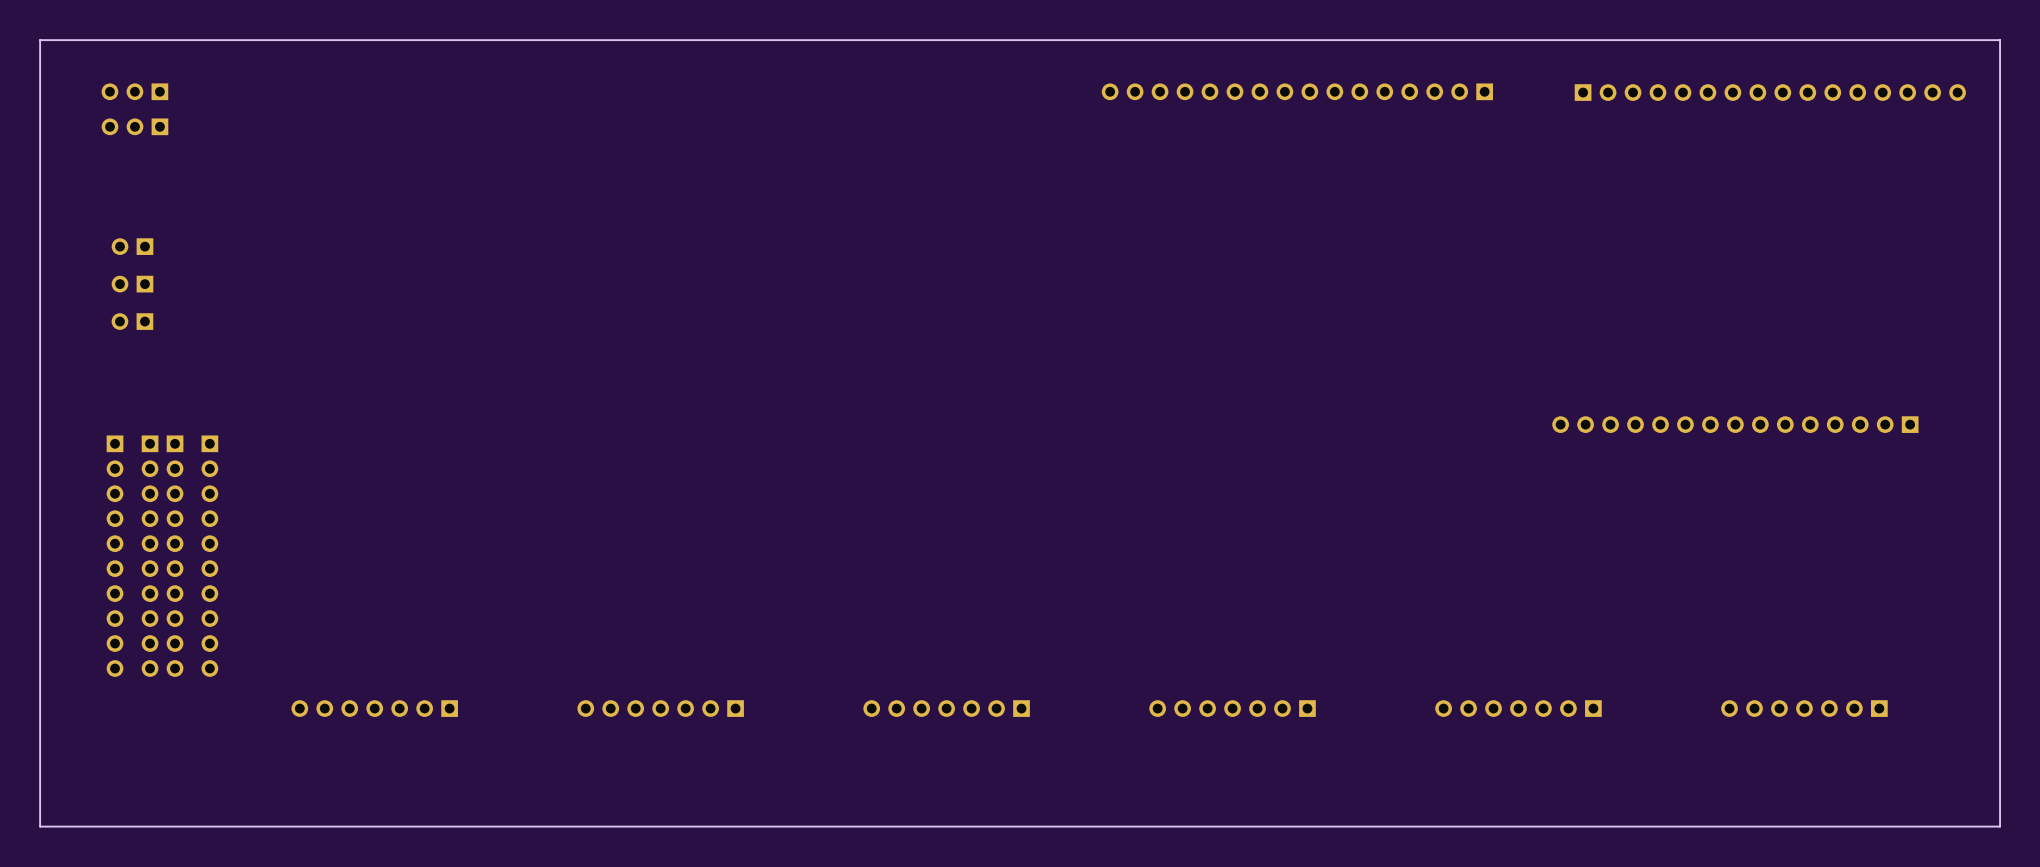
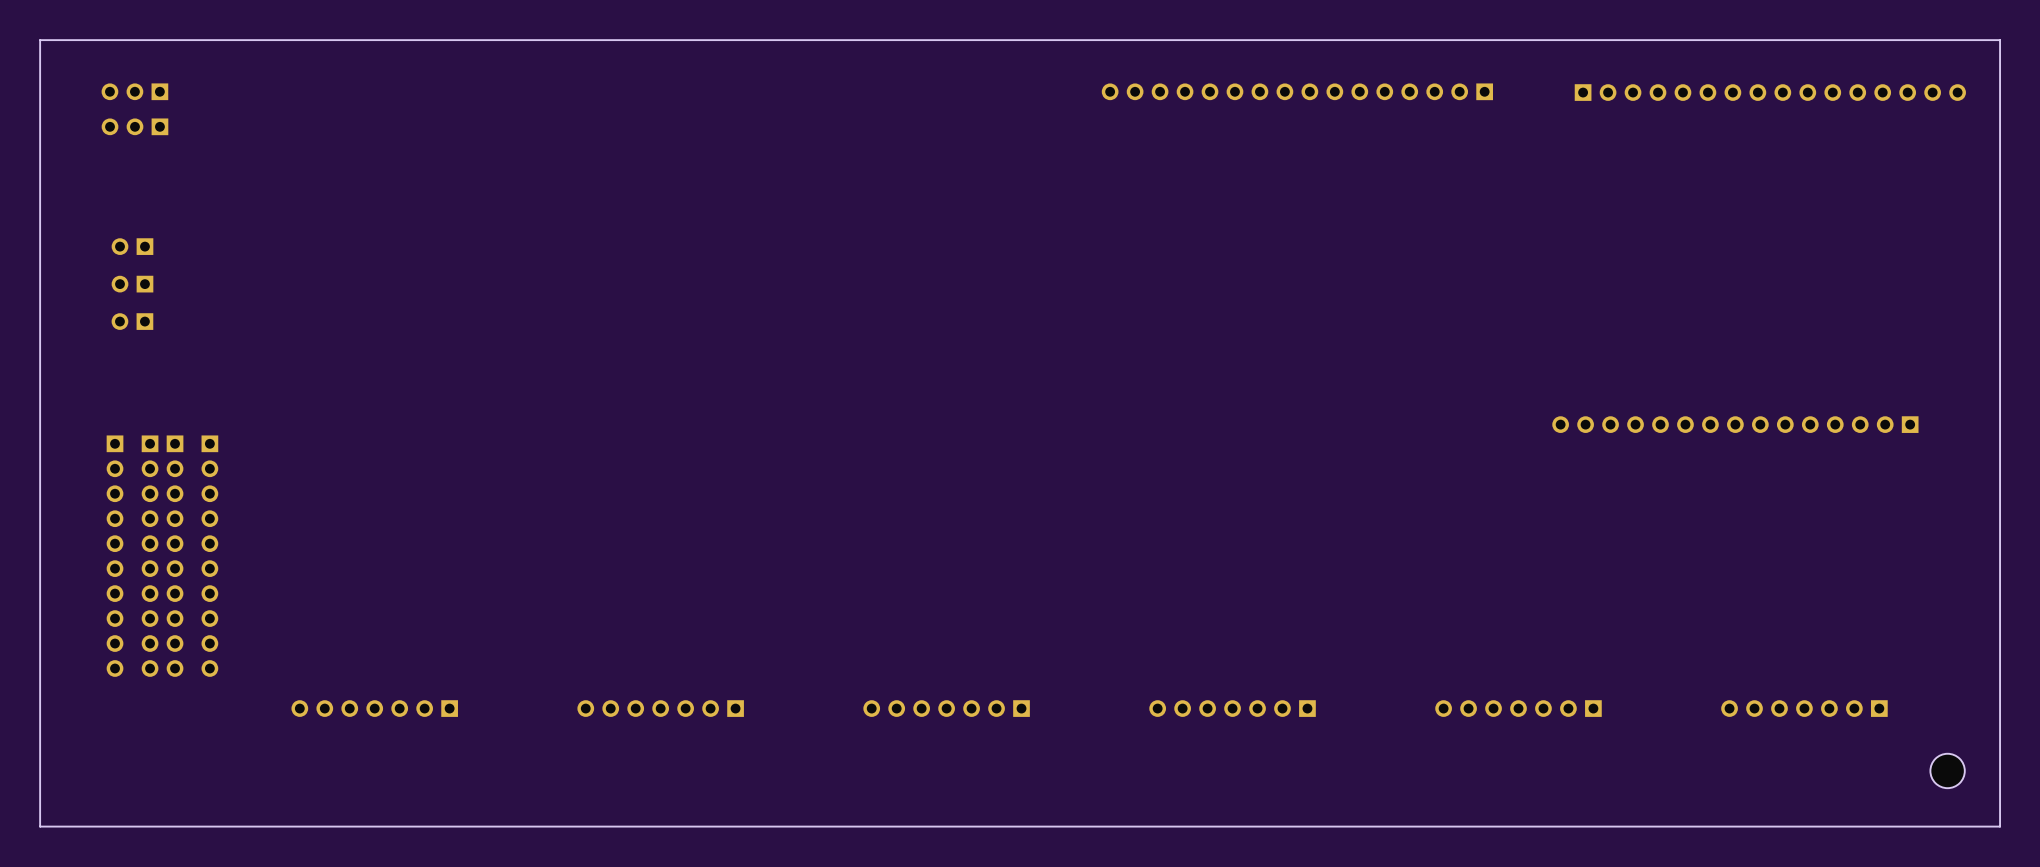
part: none -> (1947, 770)

